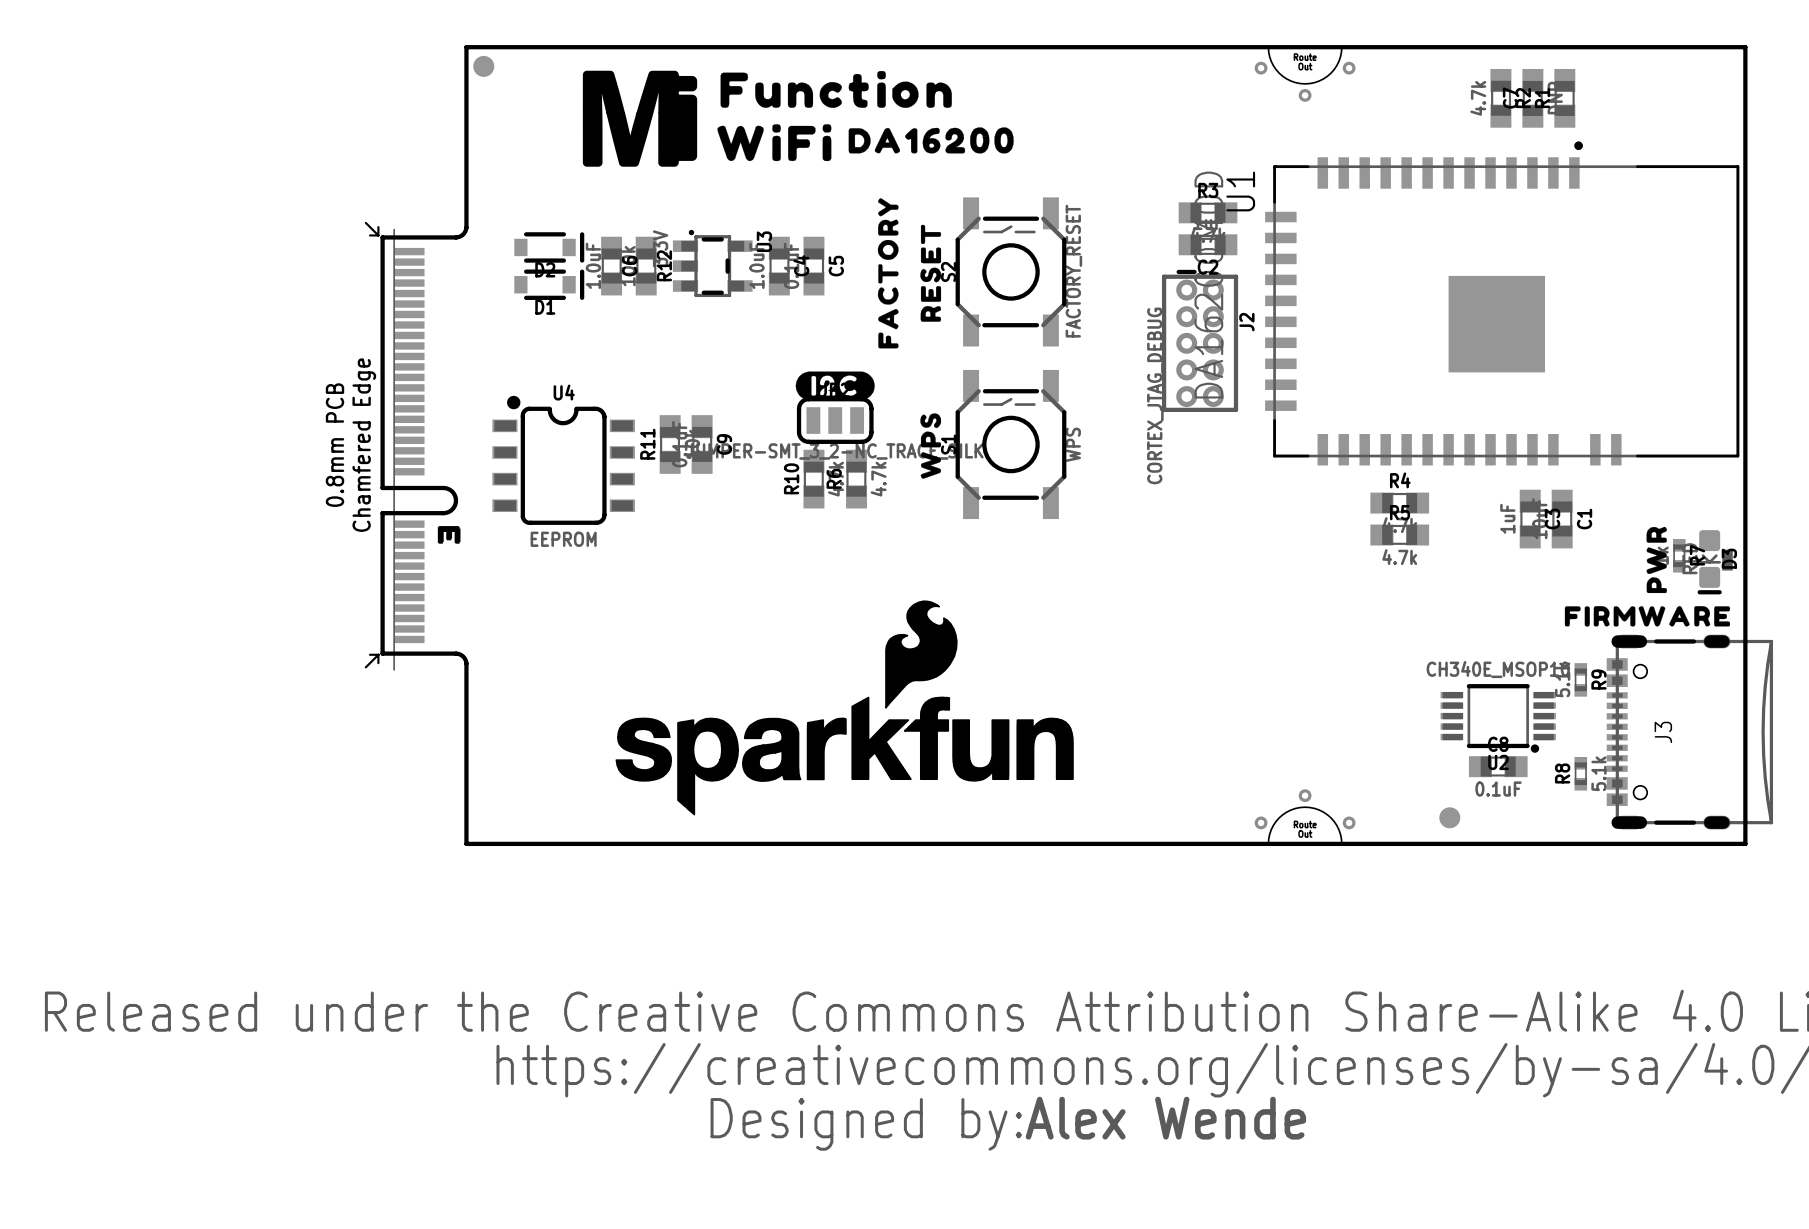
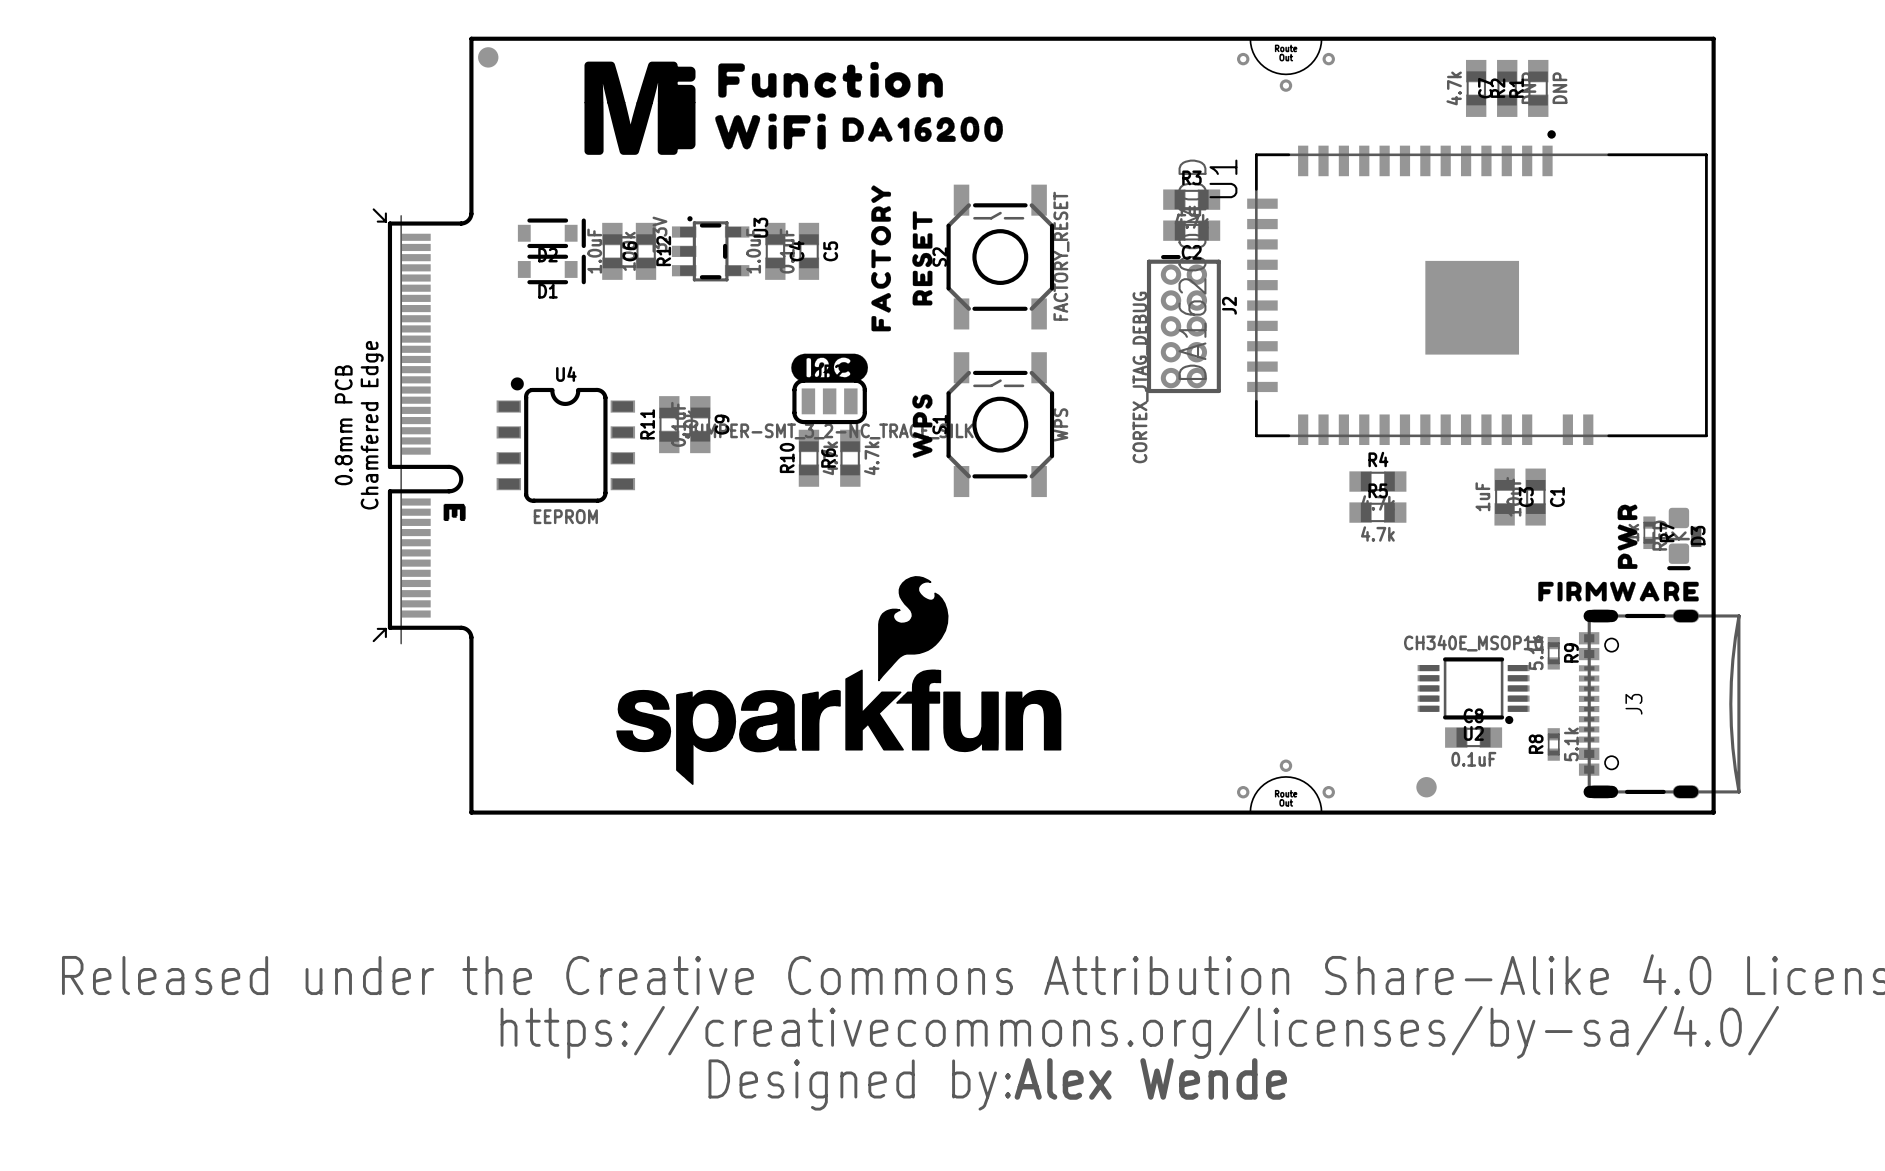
R1 value: none -> DNP (1559, 88)

